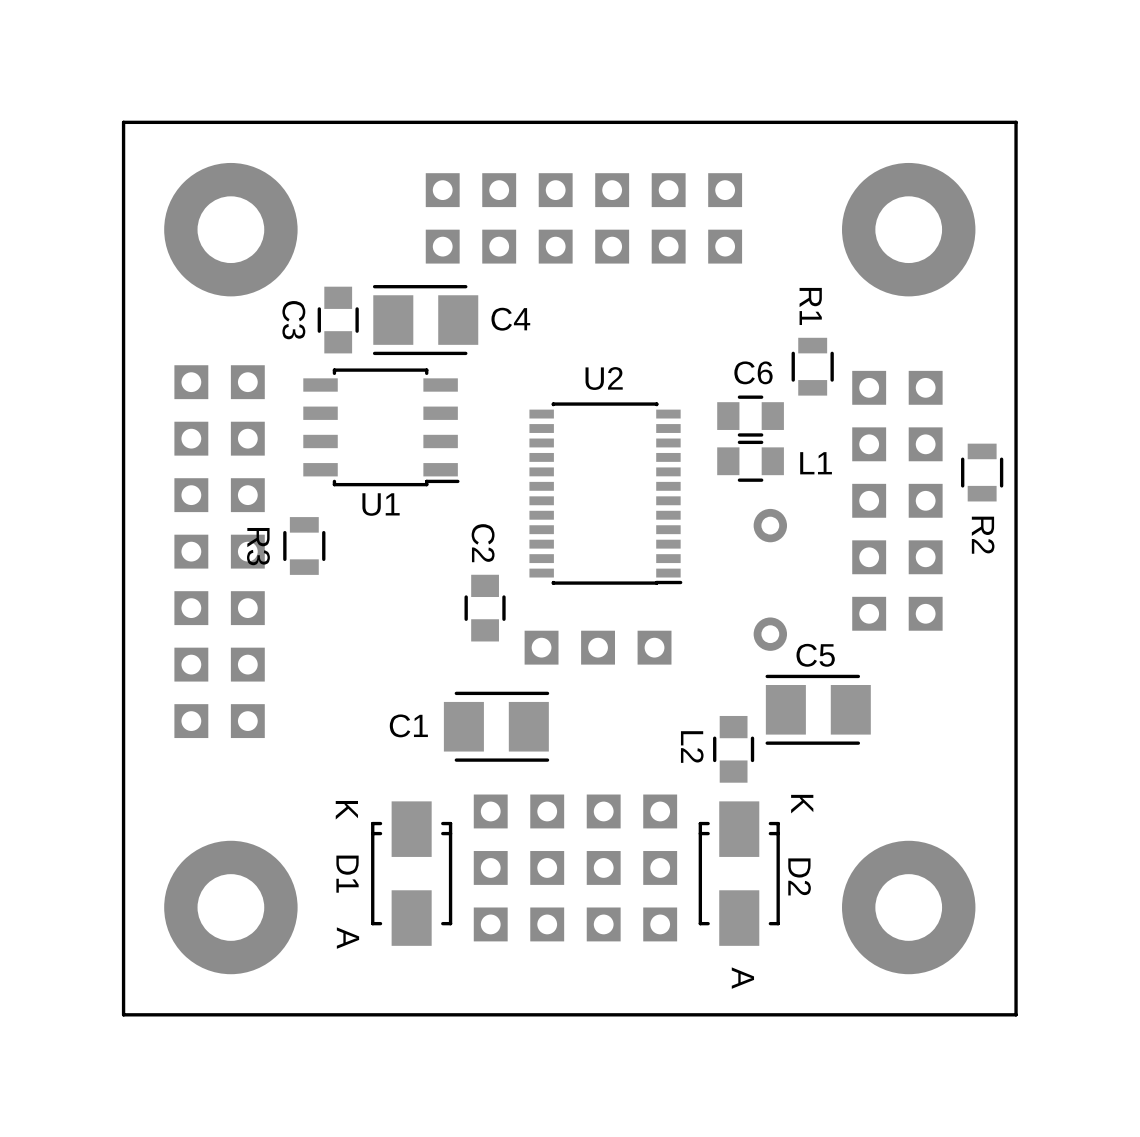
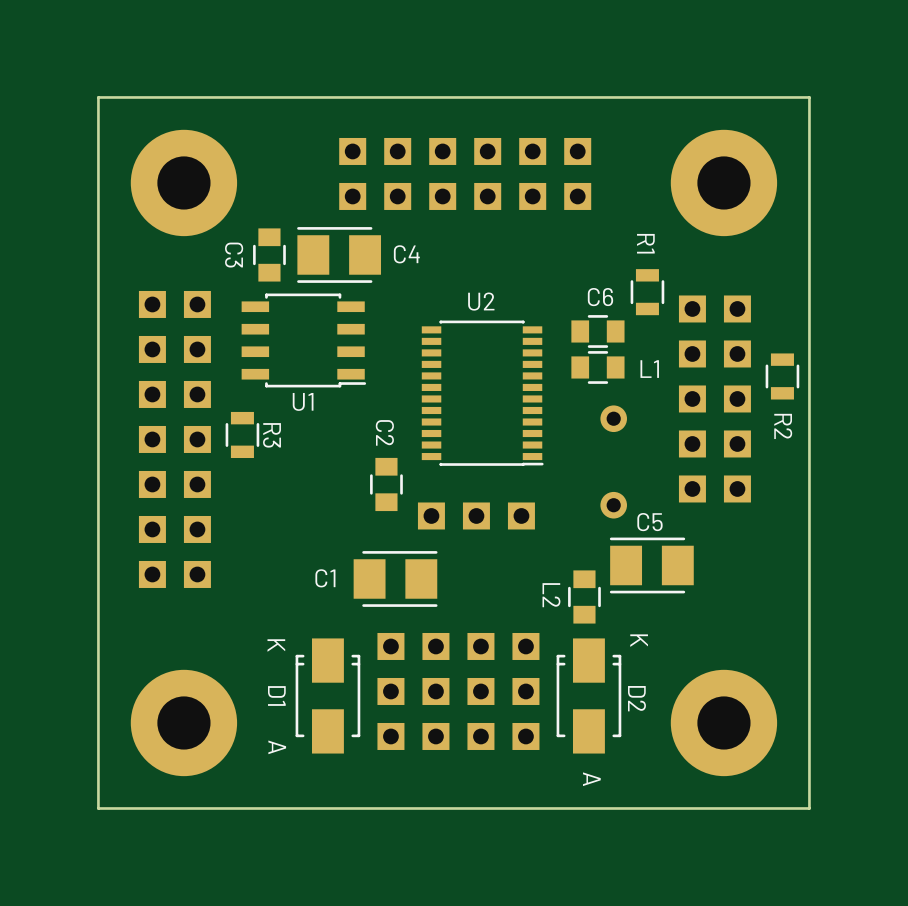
R3 name position: R3 (258, 546) -> R3 (271, 435)

